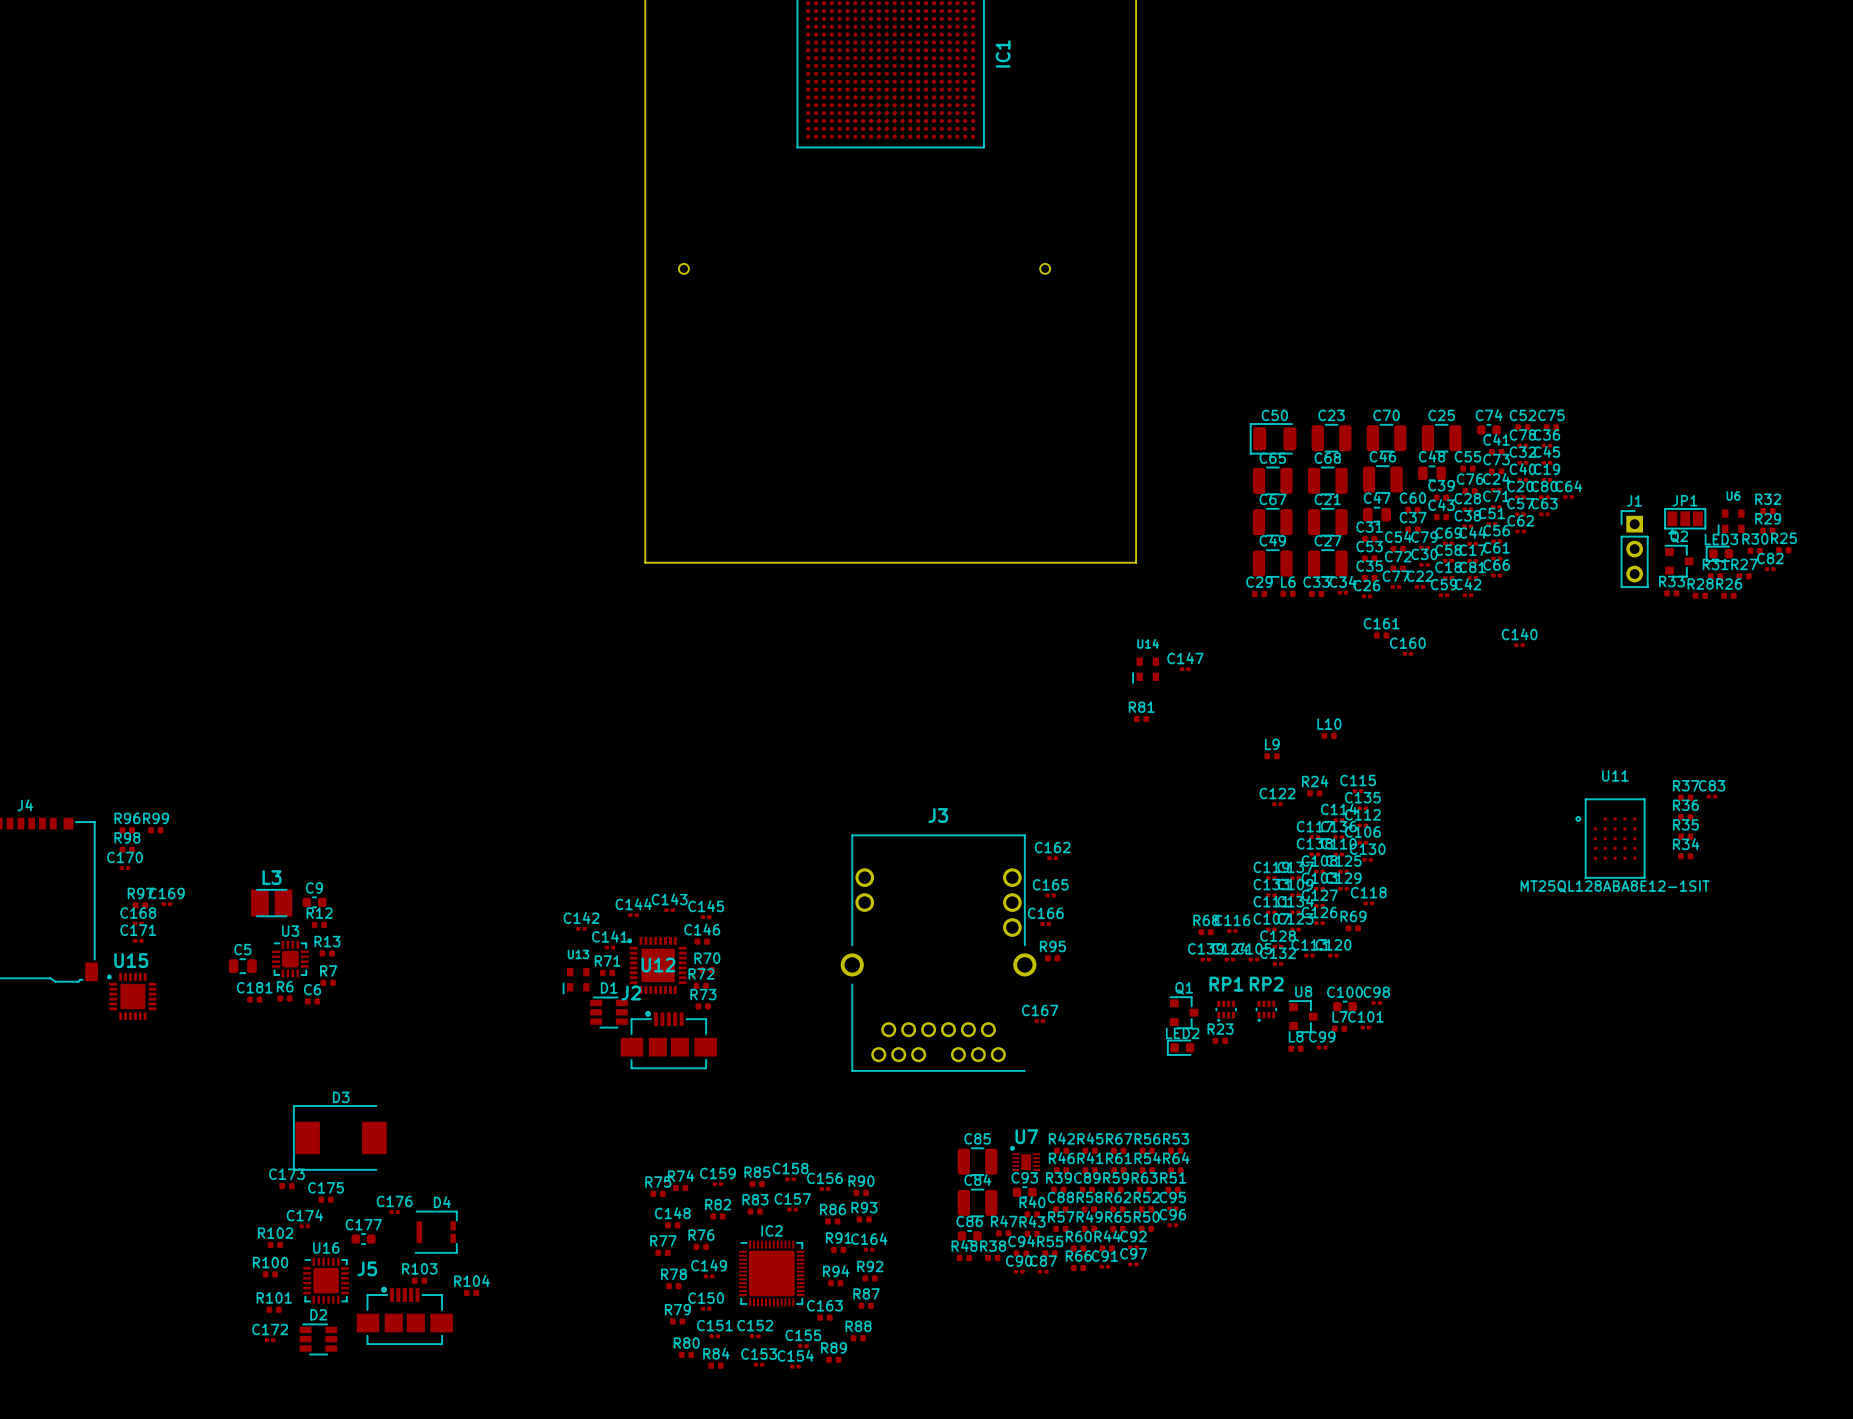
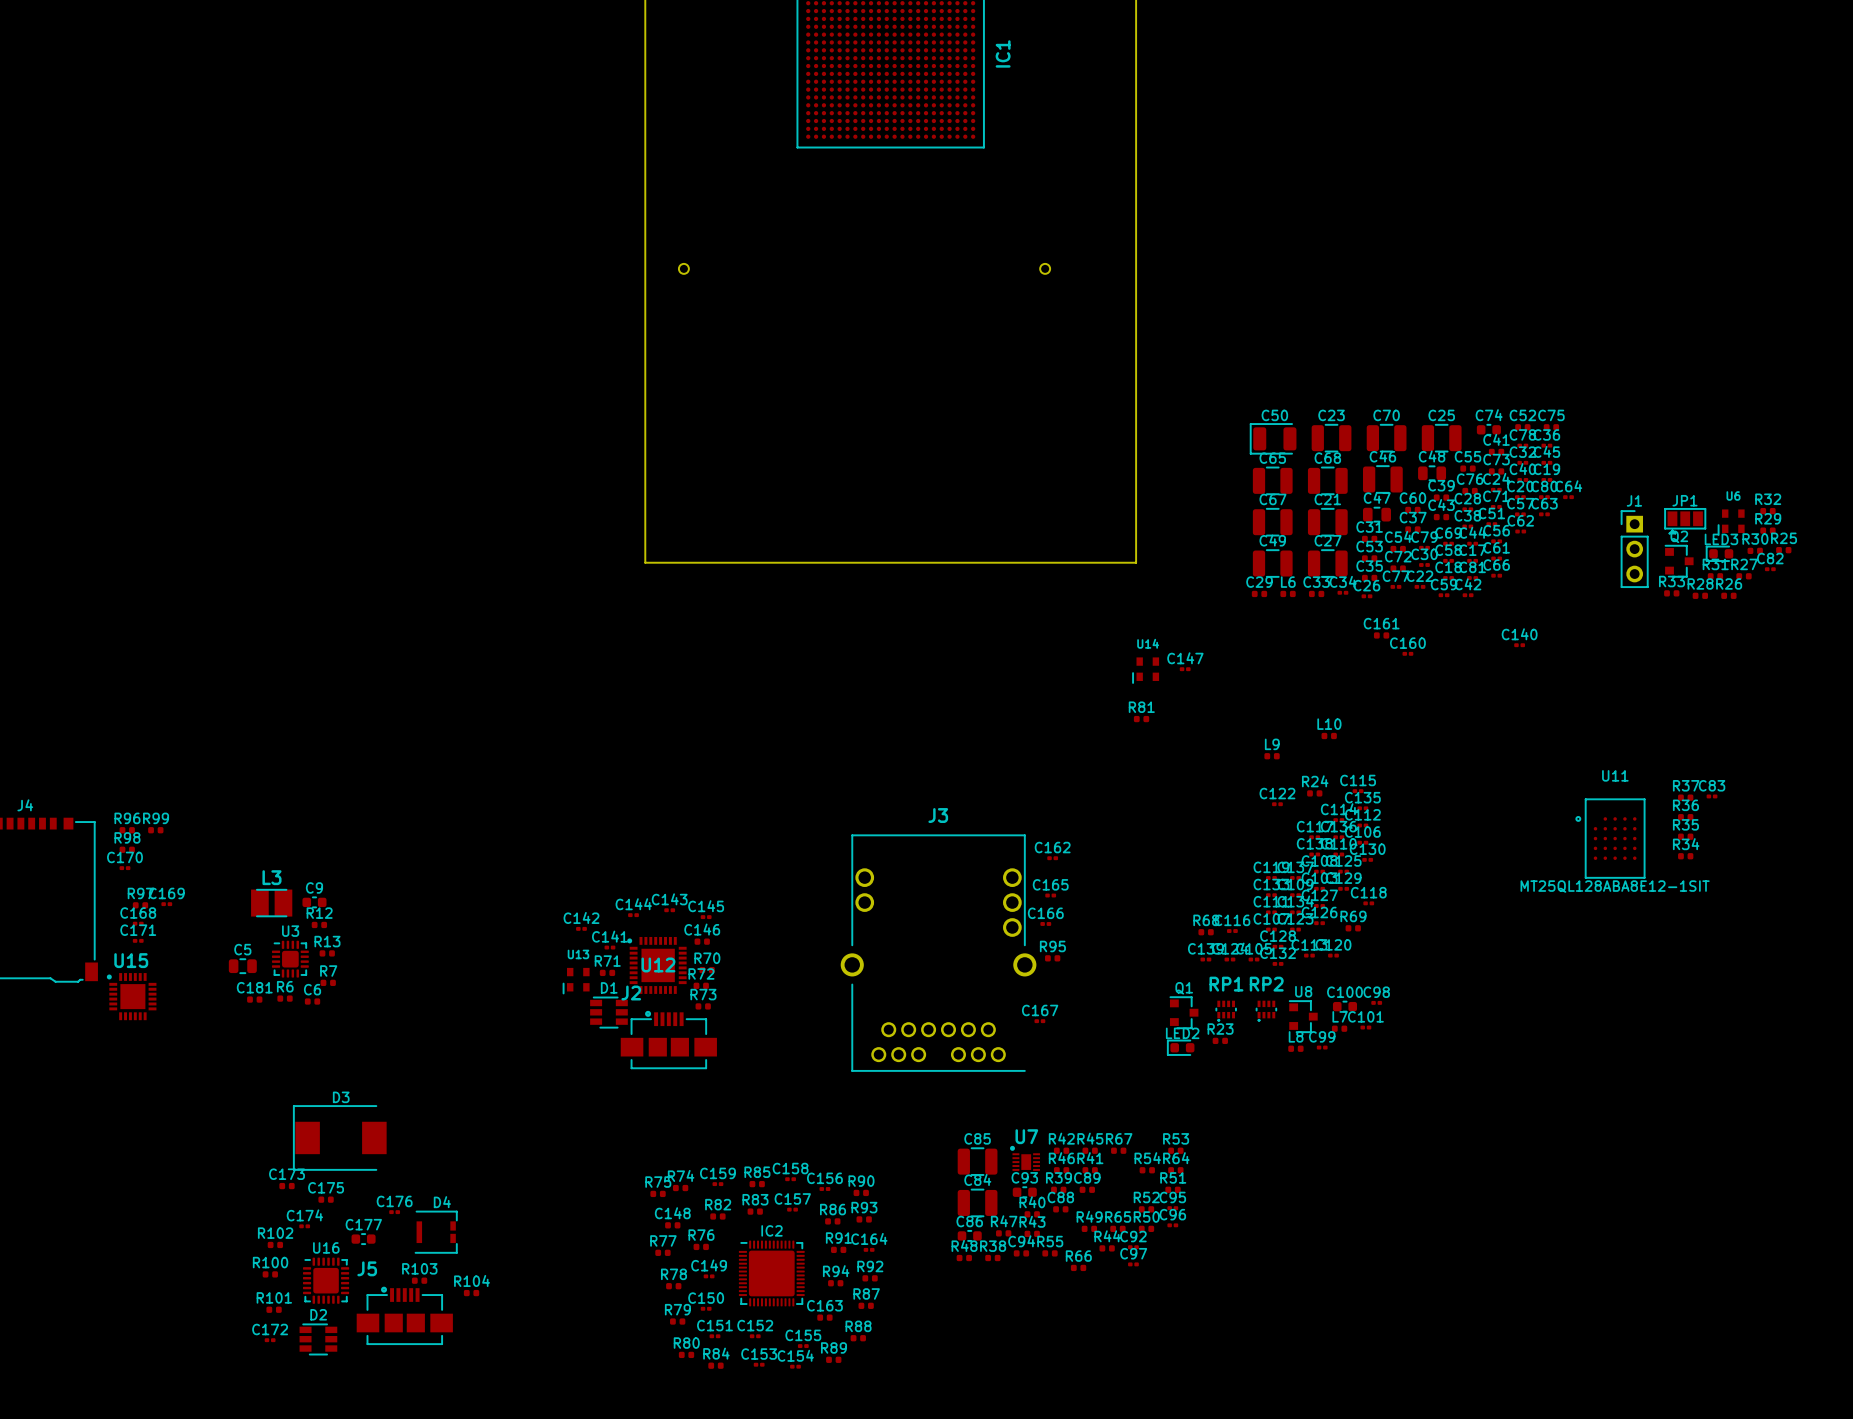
R56: (1147, 1150) -> none
R61: (1118, 1170) -> none
R59: (1115, 1189) -> none
R63: (1144, 1189) -> none
R58: (1089, 1209) -> none
R62: (1117, 1209) -> none
R57: (1060, 1228) -> none
R60: (1078, 1248) -> none
C91: (1104, 1266) -> none
C90: (1019, 1271) -> none
C87: (1043, 1271) -> none

